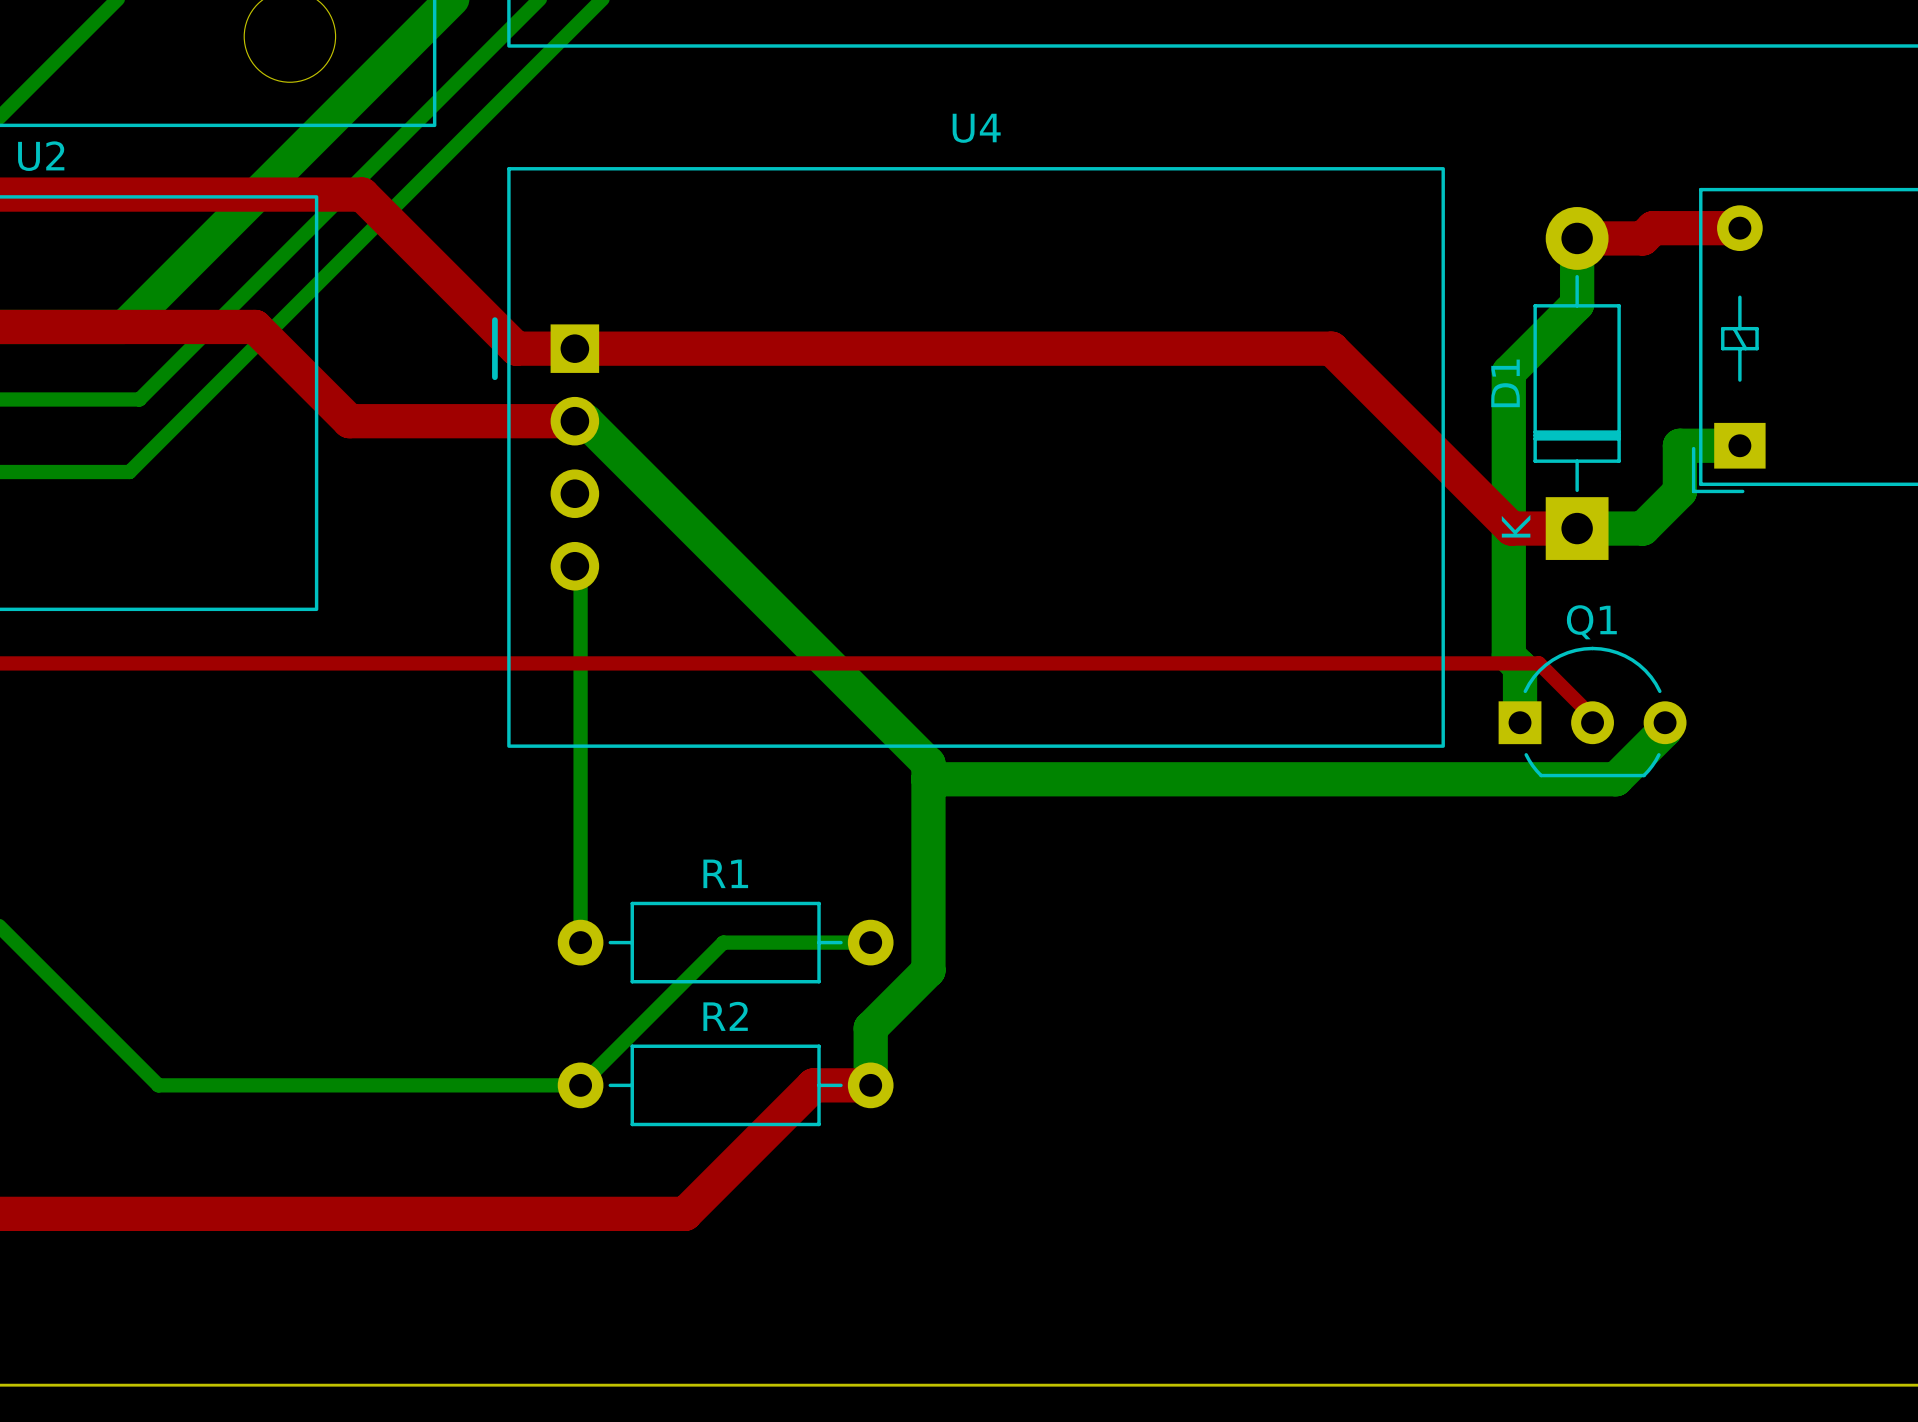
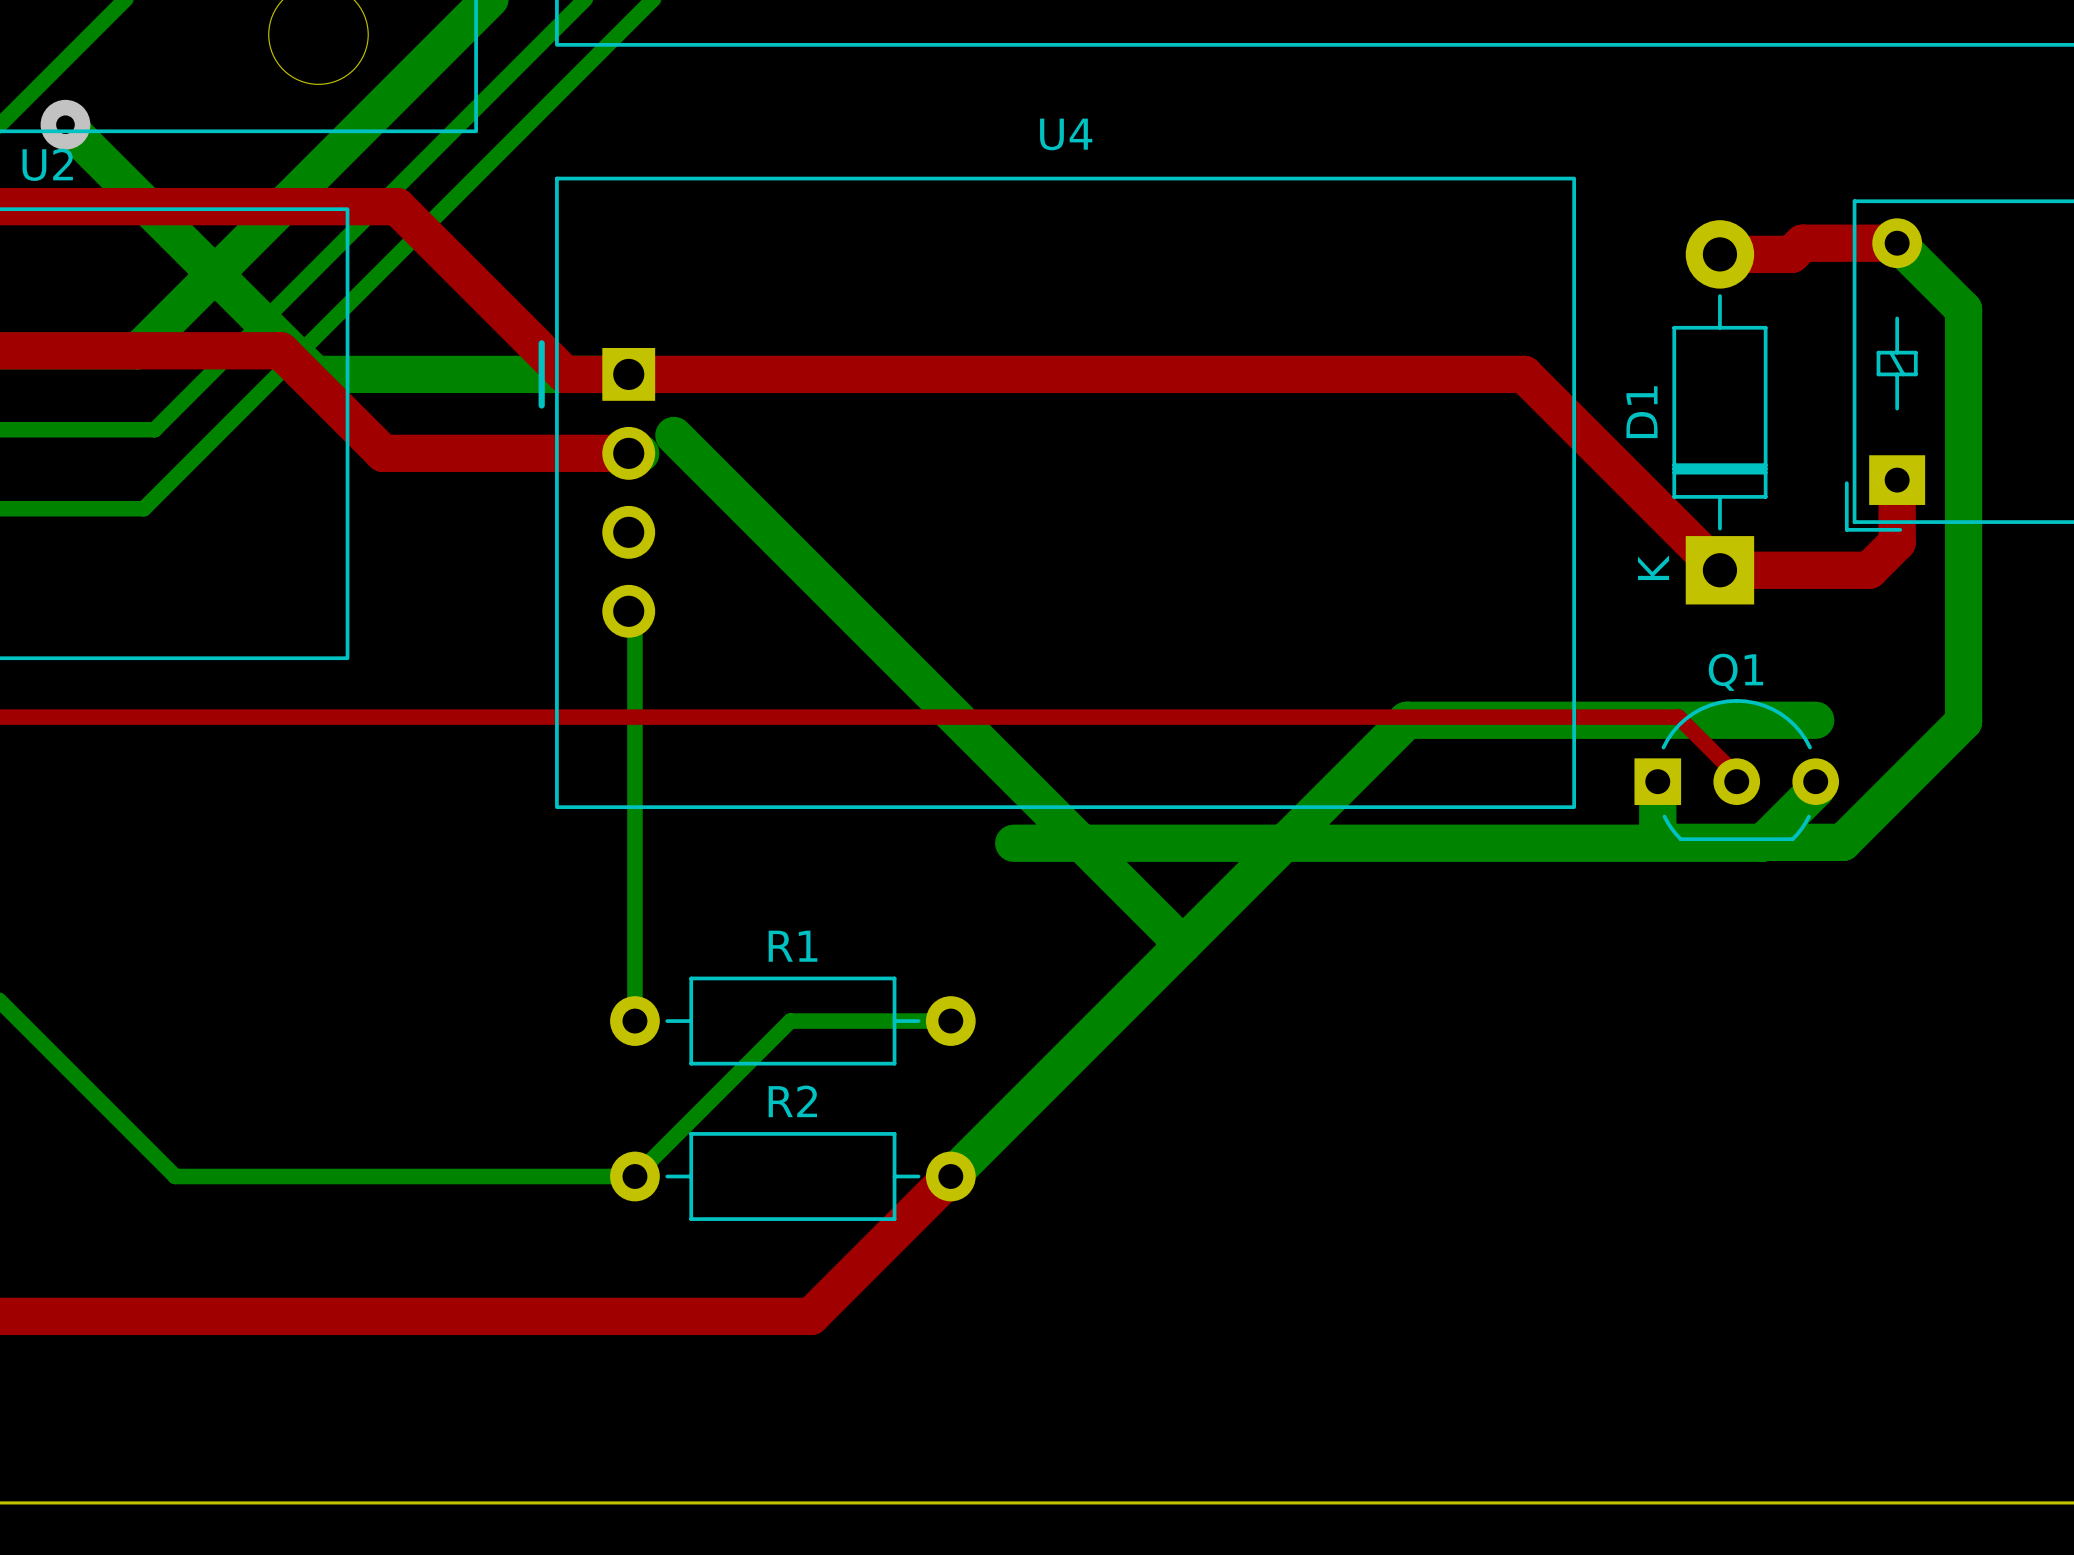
bottom track: none -> (65, 124) (315, 374) (628, 374)
via: none -> (65, 124)
bottom track: (1577, 238) (1577, 304) (1508, 372) (1508, 655) (1520, 666) (1520, 722) -> (1897, 243) (1963, 309) (1963, 721) (1842, 842) (1657, 842) (1657, 781)
top track: (1331, 348) (1511, 528) (1577, 528) -> (1452, 374) (1524, 374) (1719, 570) (1869, 570) (1897, 542) (1897, 480)
bottom track: none -> (673, 435) (1182, 944)
bottom track: (585, 421) (928, 763) (928, 970) (870, 1028) (870, 1085) -> (1815, 720) (1407, 720) (950, 1176)
bottom track: (1739, 445) (1679, 445) (1679, 491) (1642, 528) (1577, 528) -> none
top track: (870, 1085) (813, 1085) (685, 1213) -> (950, 1176) (810, 1316) (748, 1316)

